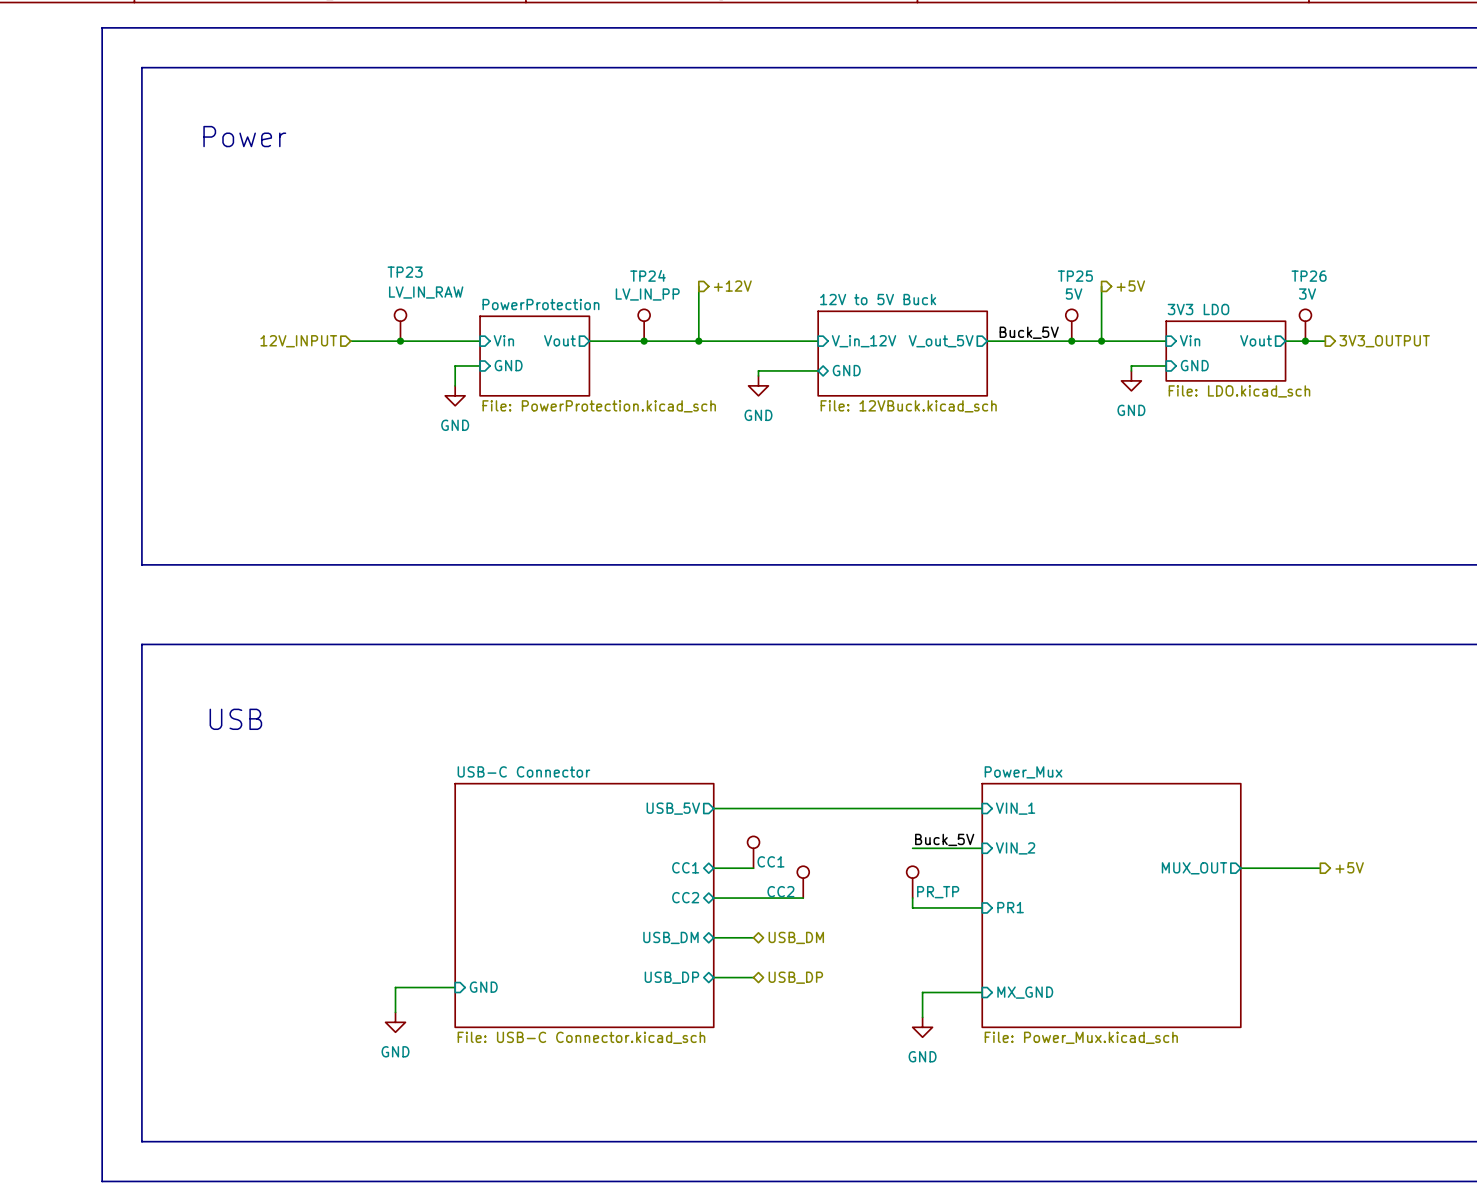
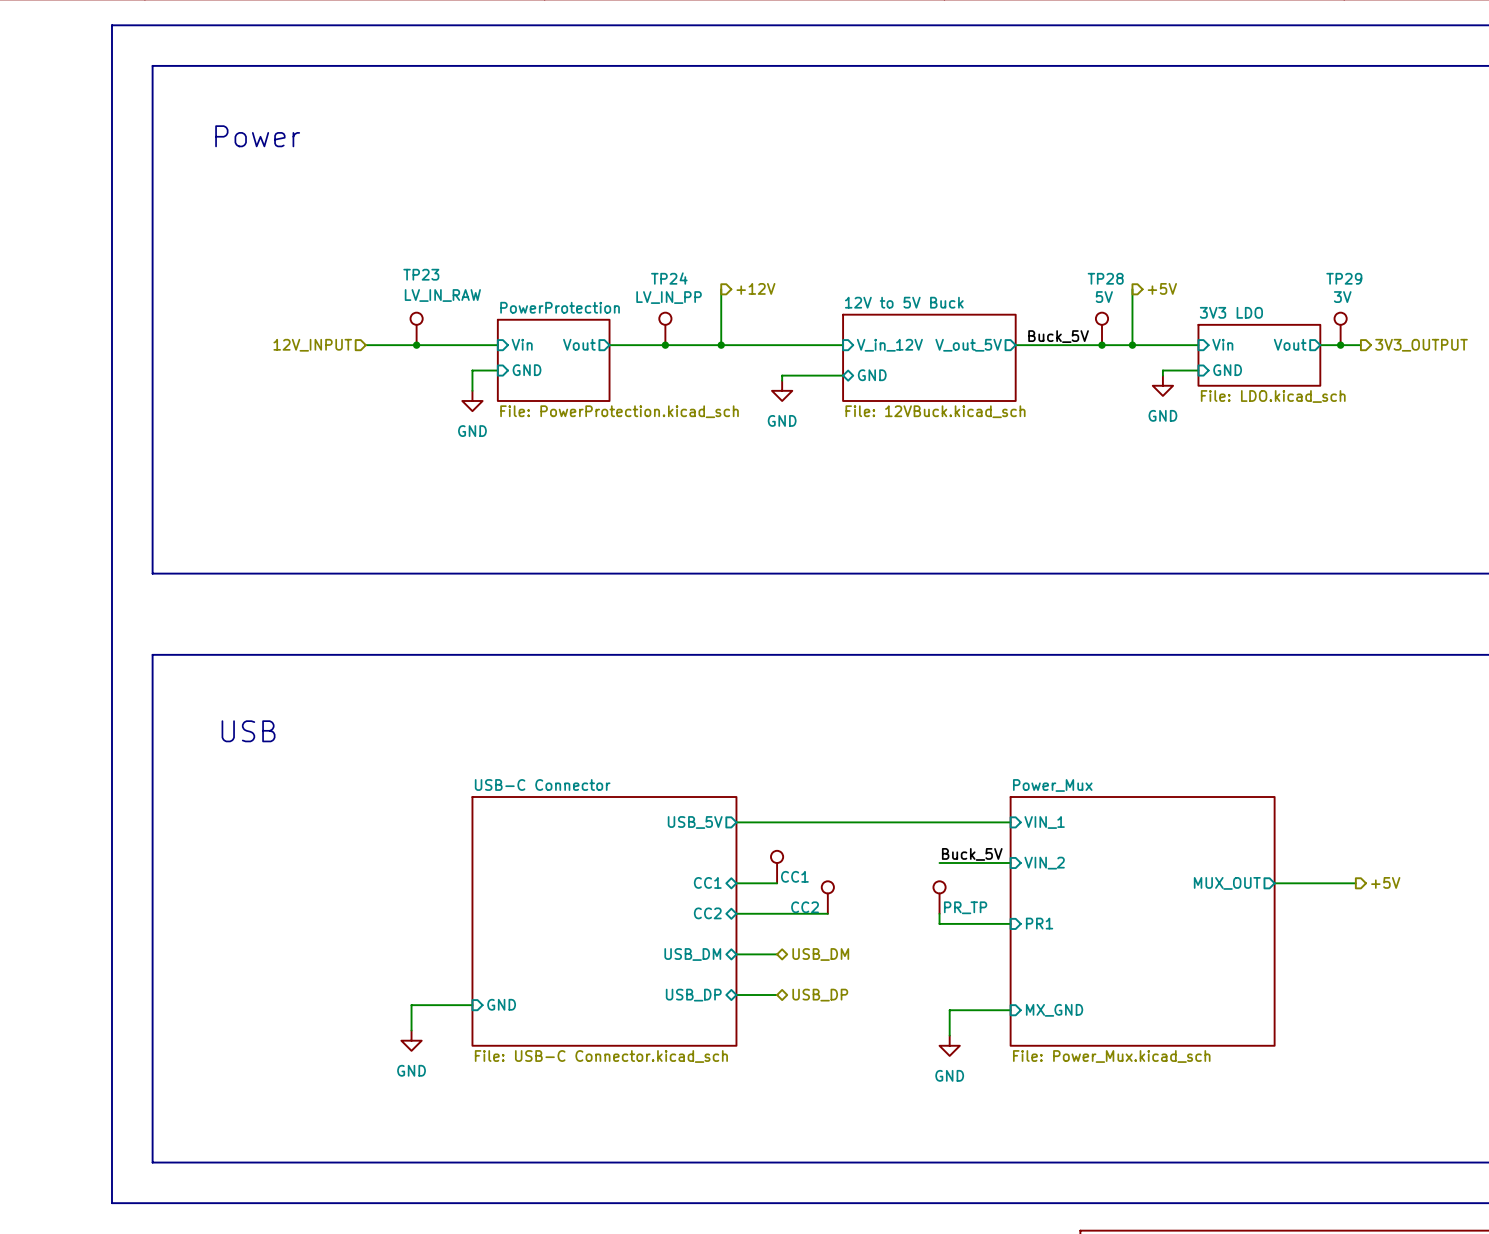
TP25 name: TP25 (1075, 276) -> TP28 (1105, 278)
TP26 name: TP26 (1309, 276) -> TP29 (1344, 278)

